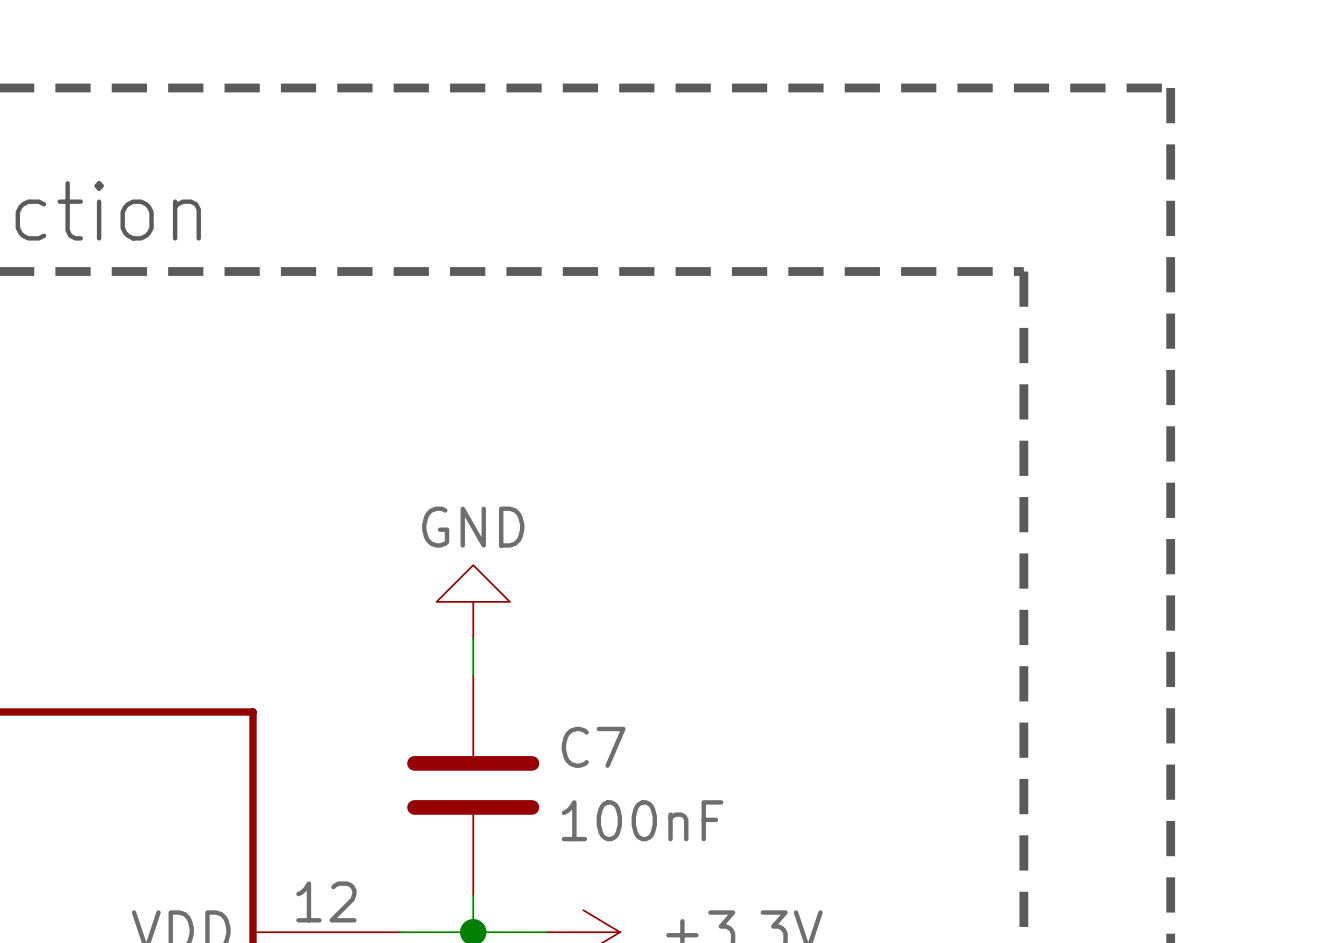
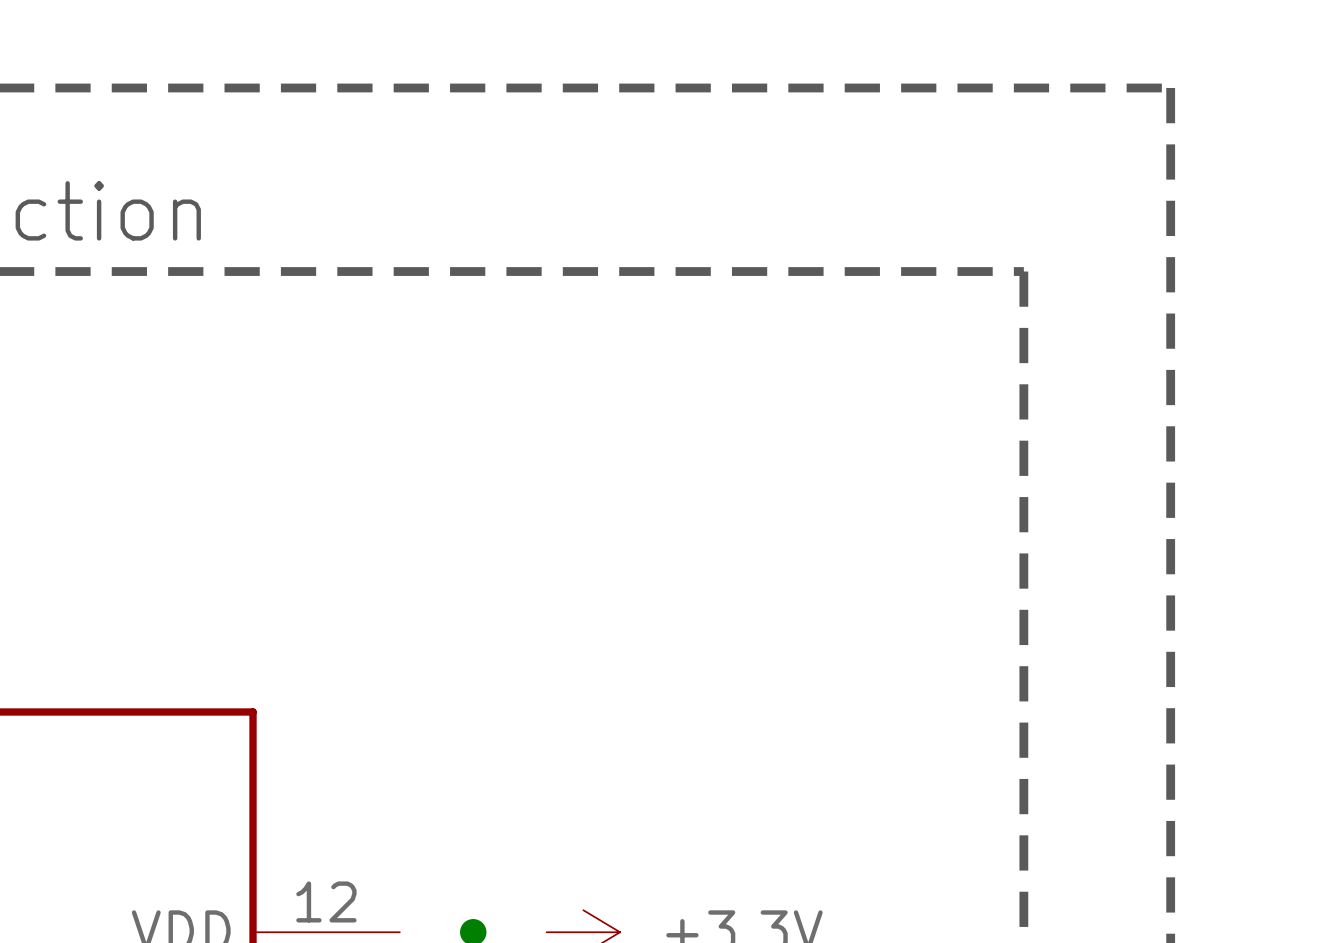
power symbol: GND (473, 601) -> none
wire: (473, 638) (473, 675) -> none
C7: 100nF (473, 785) -> none
wire: (473, 895) (473, 932) -> none
wire: (399, 932) (546, 932) -> none

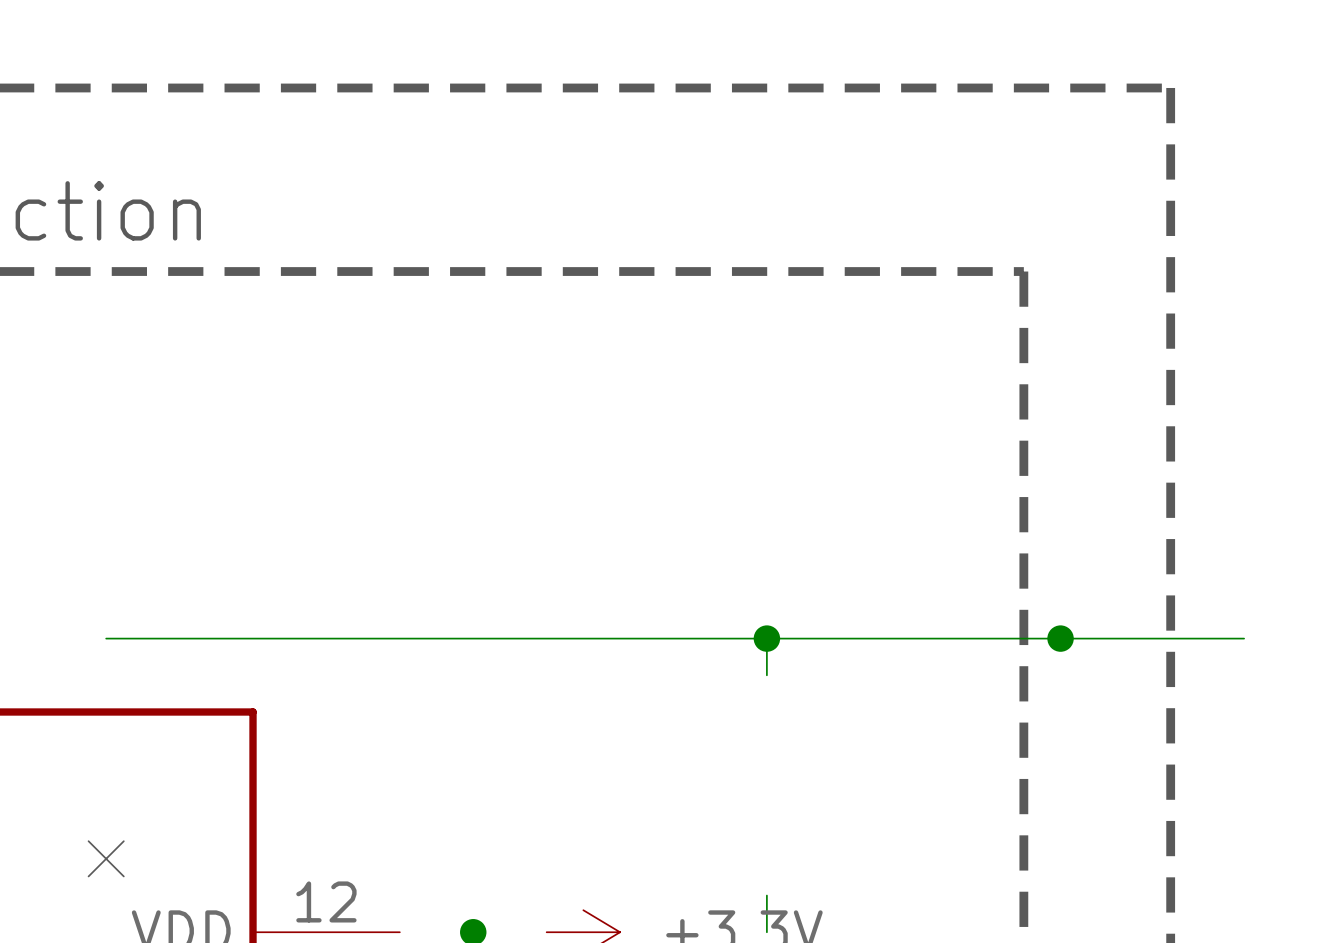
wire: none -> (106, 638) (1244, 638)
wire: none -> (766, 638) (766, 675)
junction: none -> (766, 638)
junction: none -> (1060, 638)
no-connect mark: none -> (106, 858)
wire: none -> (766, 895) (766, 932)

